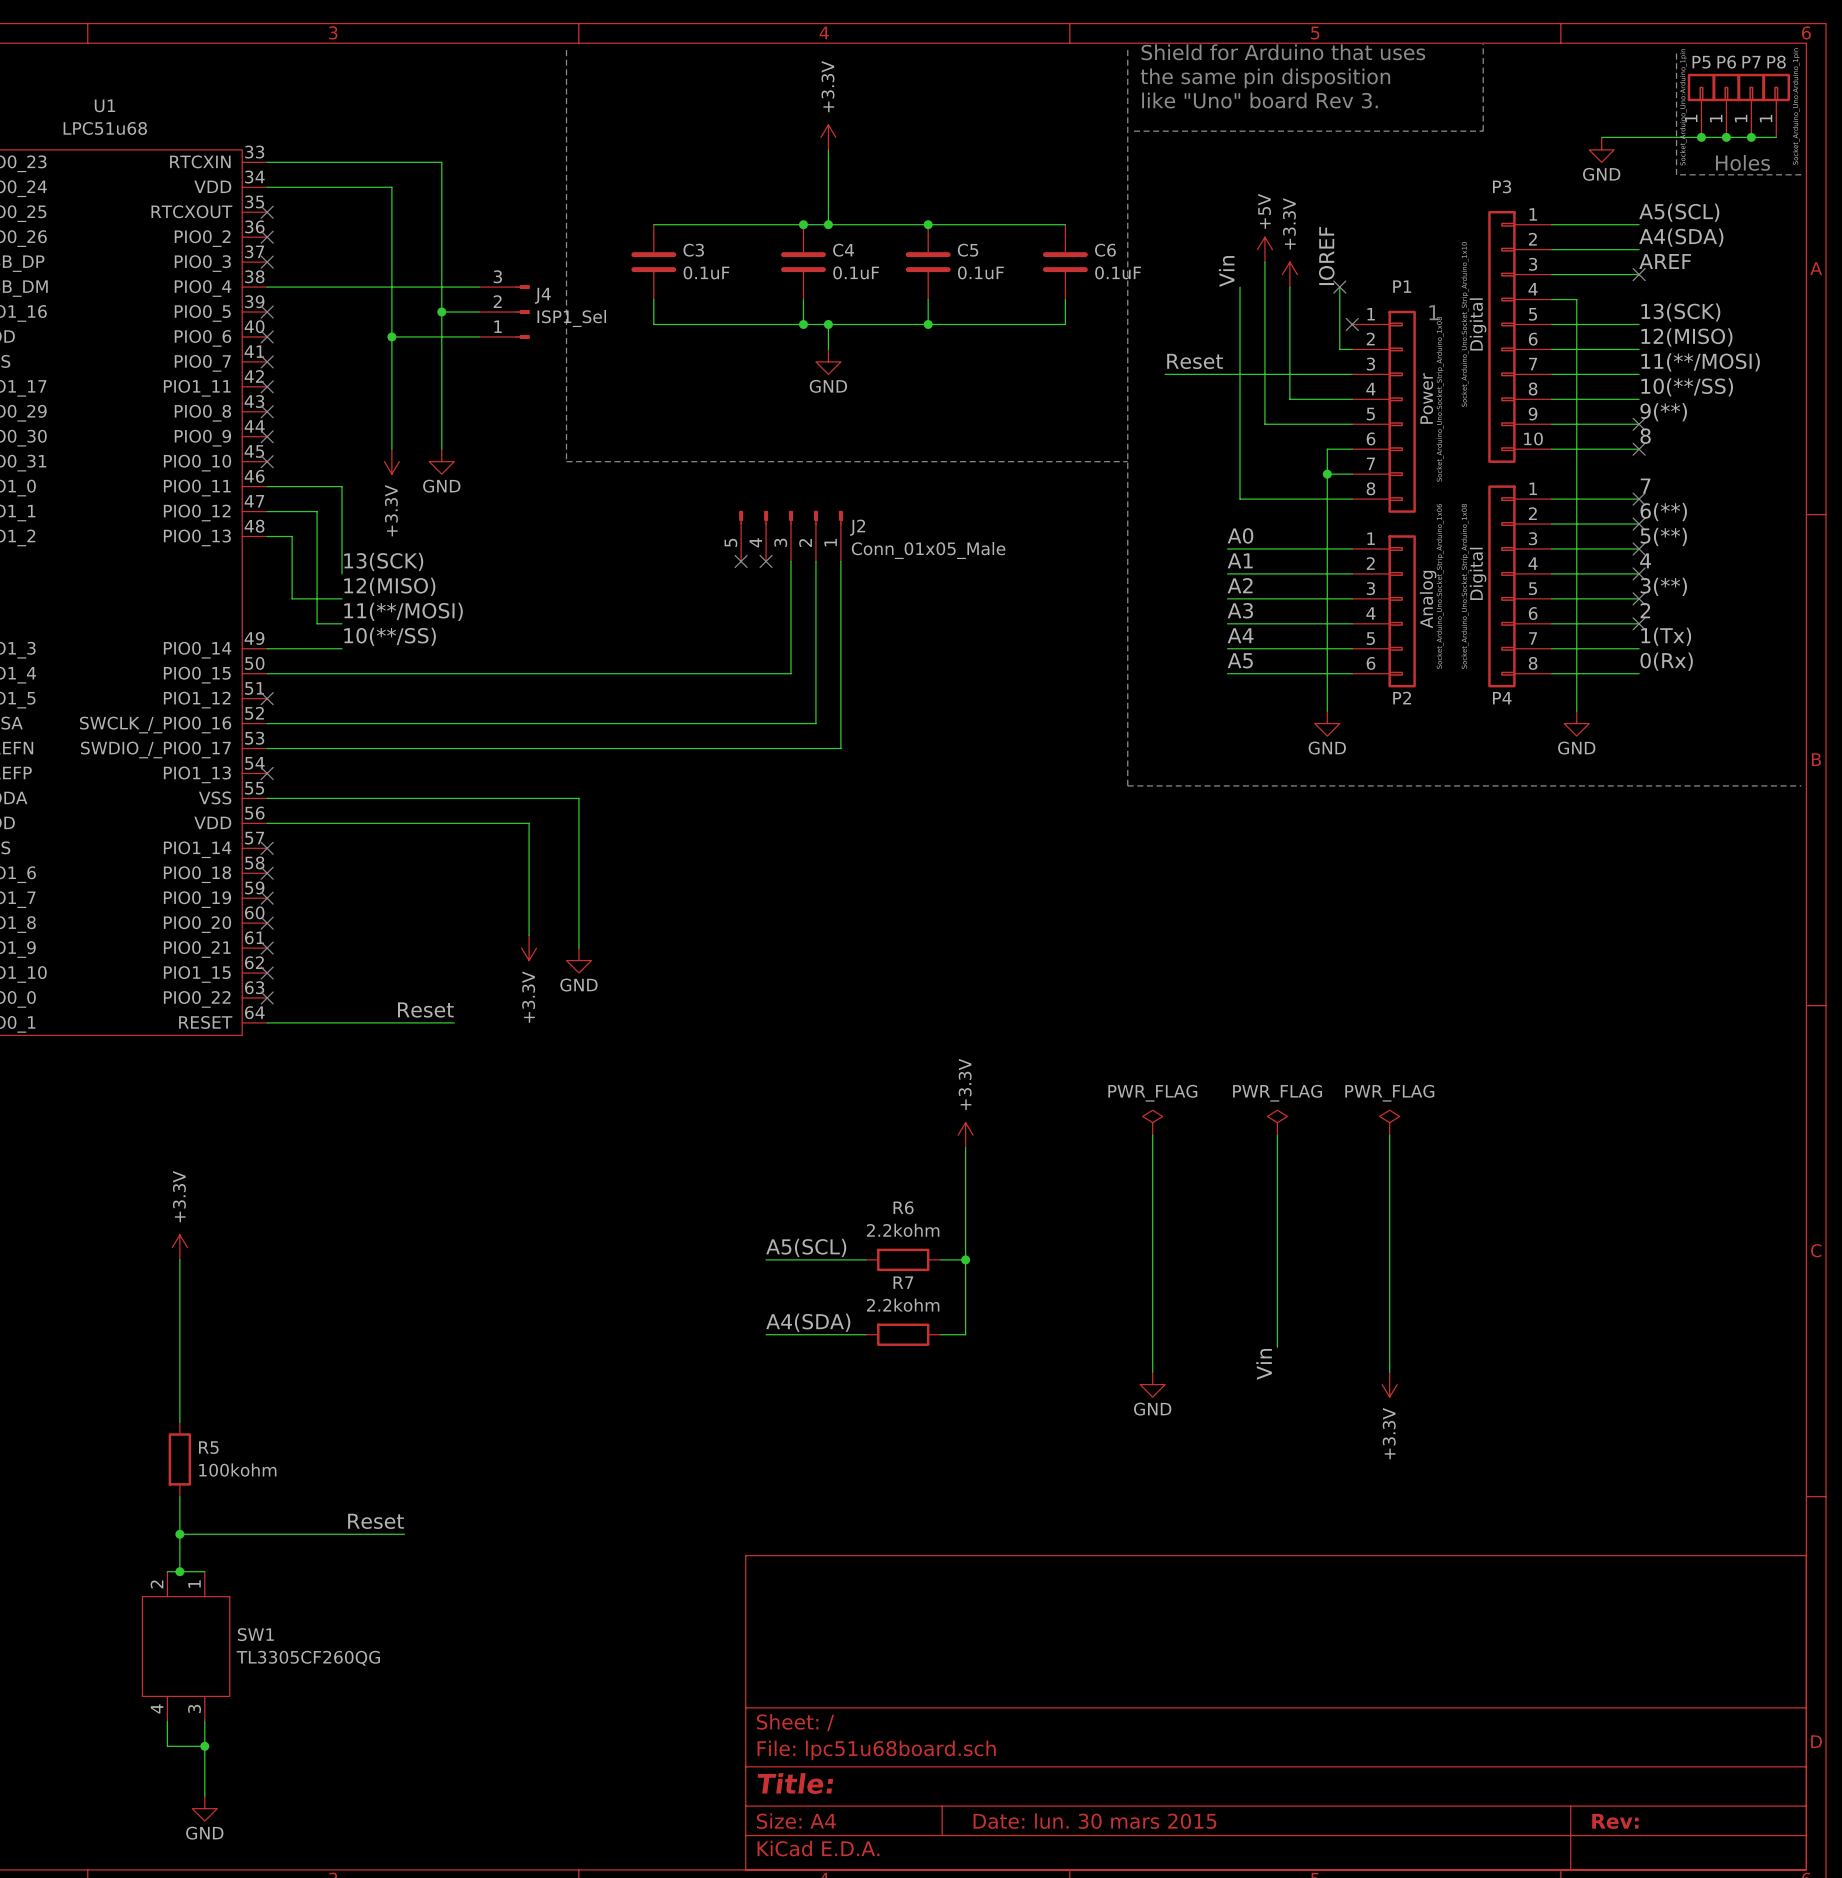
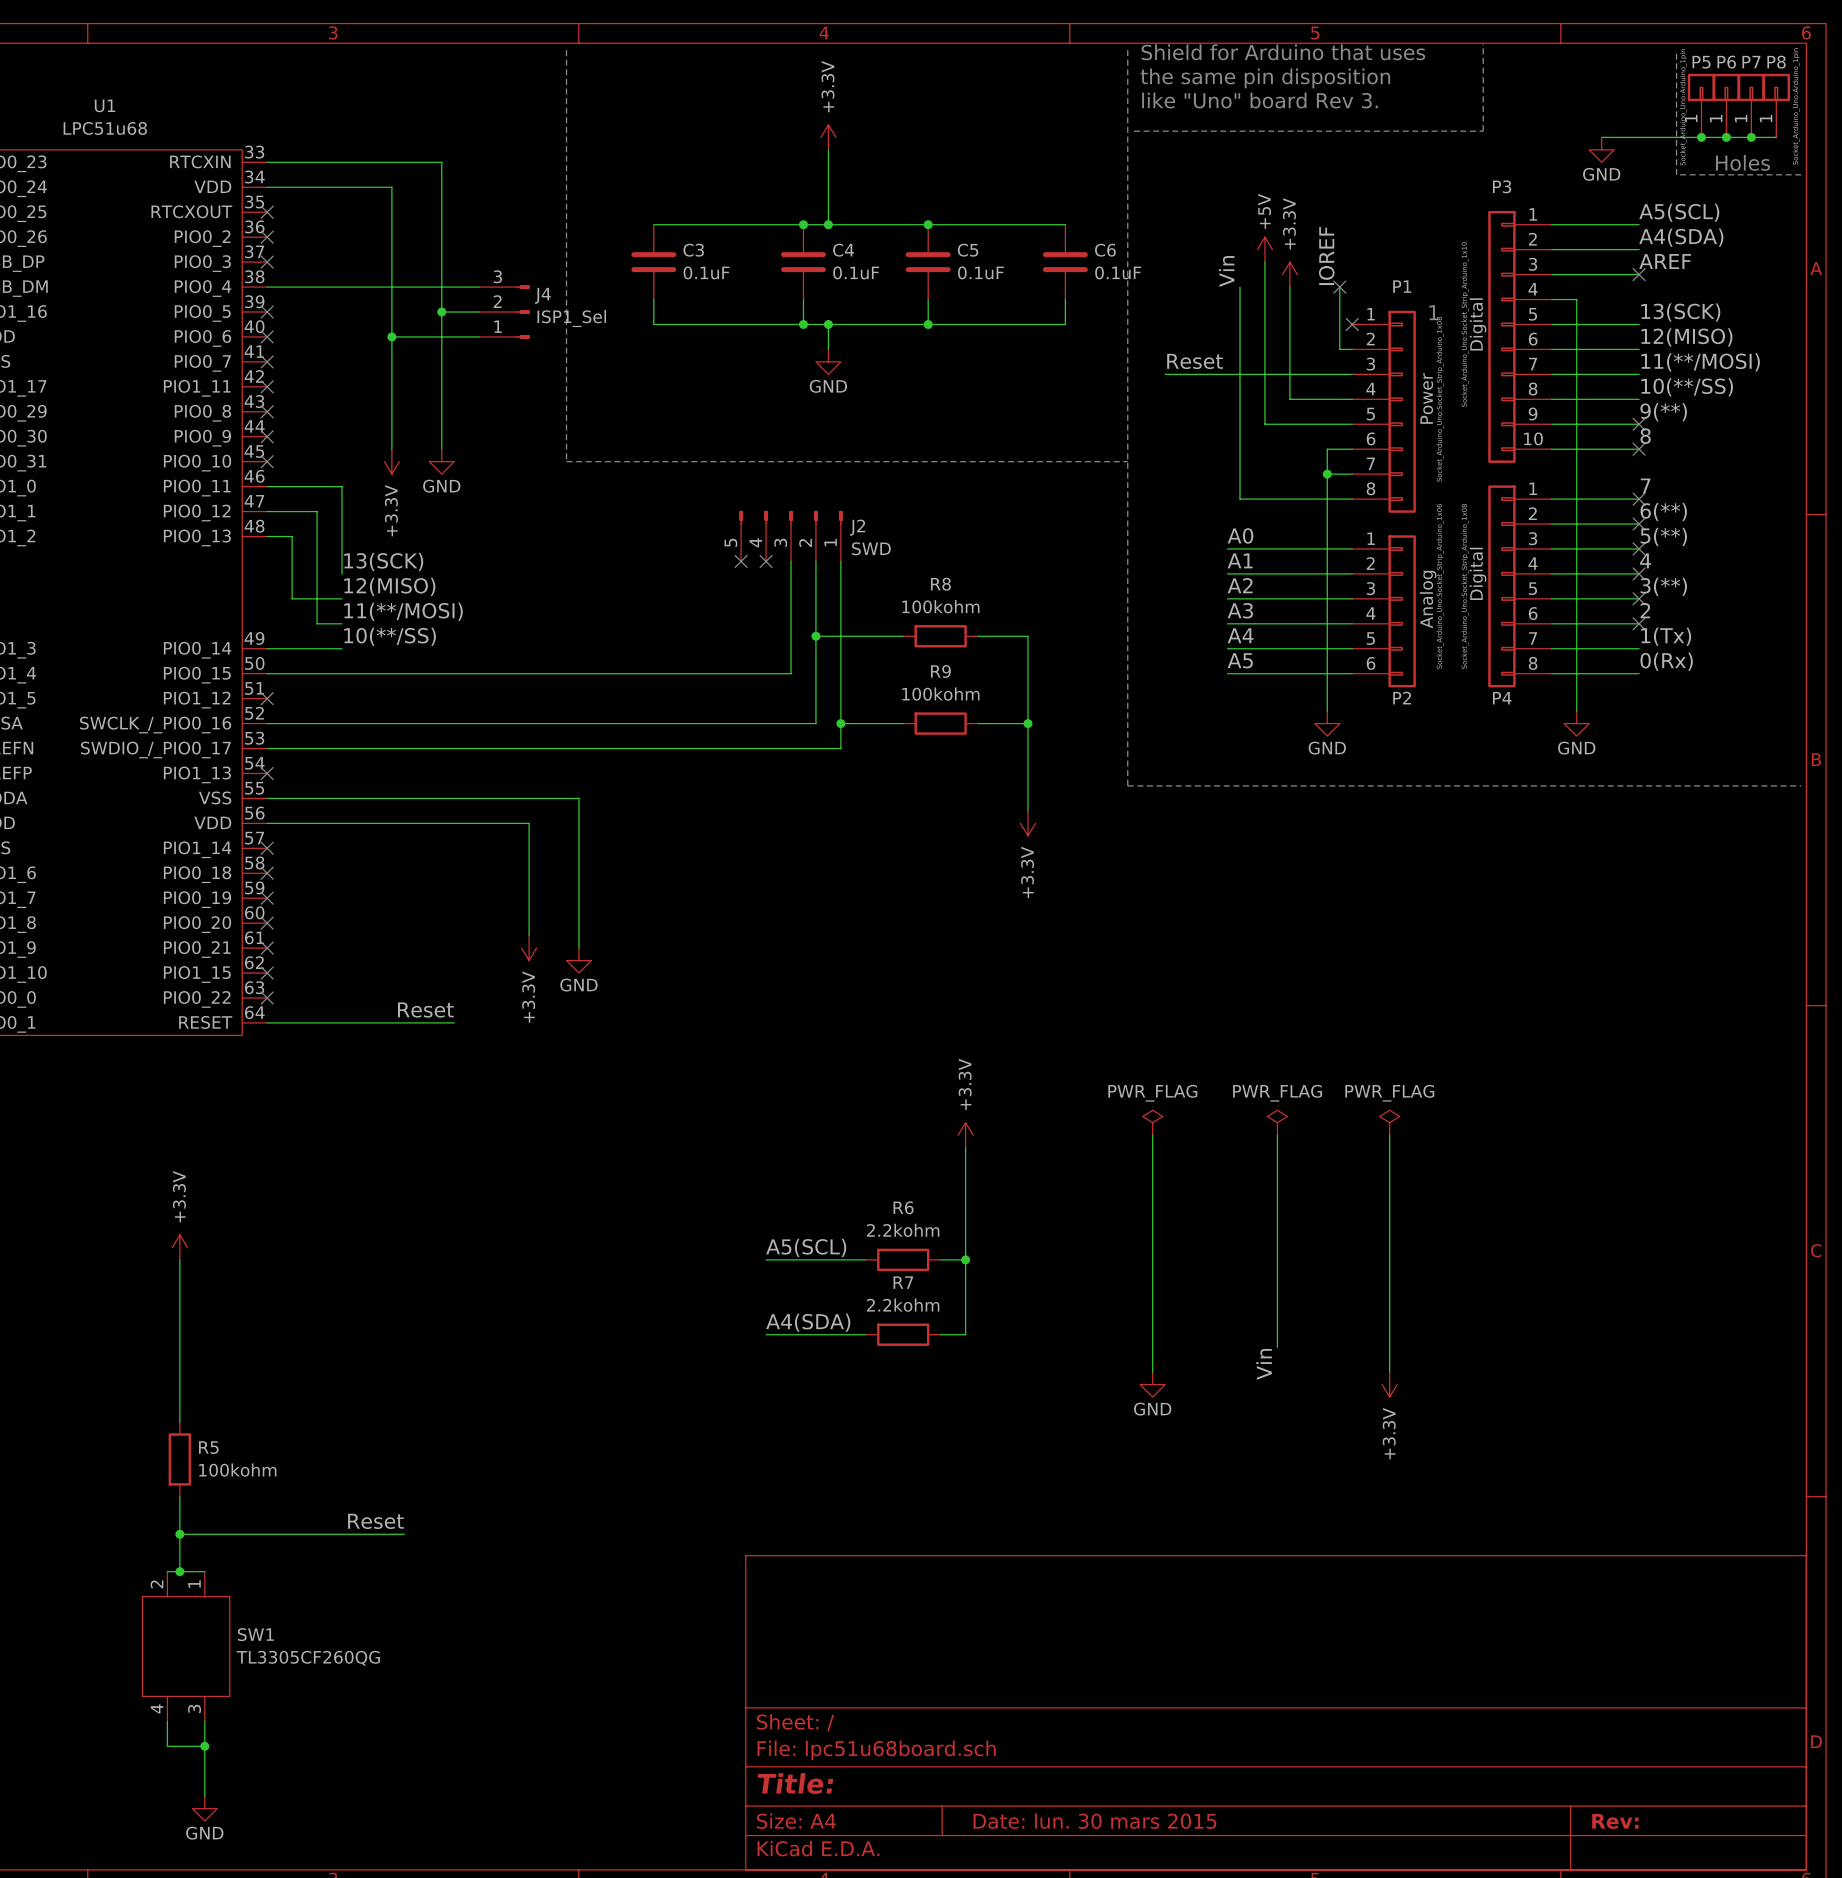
J2 value: Conn_01x05_Male (928, 550) -> SWD (871, 548)
wire: none -> (815, 636) (903, 636)
junction: none -> (815, 636)
R8: none -> 100kohm (940, 636)
wire: none -> (978, 636) (1027, 636) (1027, 810)
wire: none -> (840, 723) (903, 723)
junction: none -> (840, 723)
R9: none -> 100kohm (940, 723)
wire: none -> (978, 723) (1027, 723)
junction: none -> (1027, 723)
power symbol: none -> +3.3V (1027, 823)

